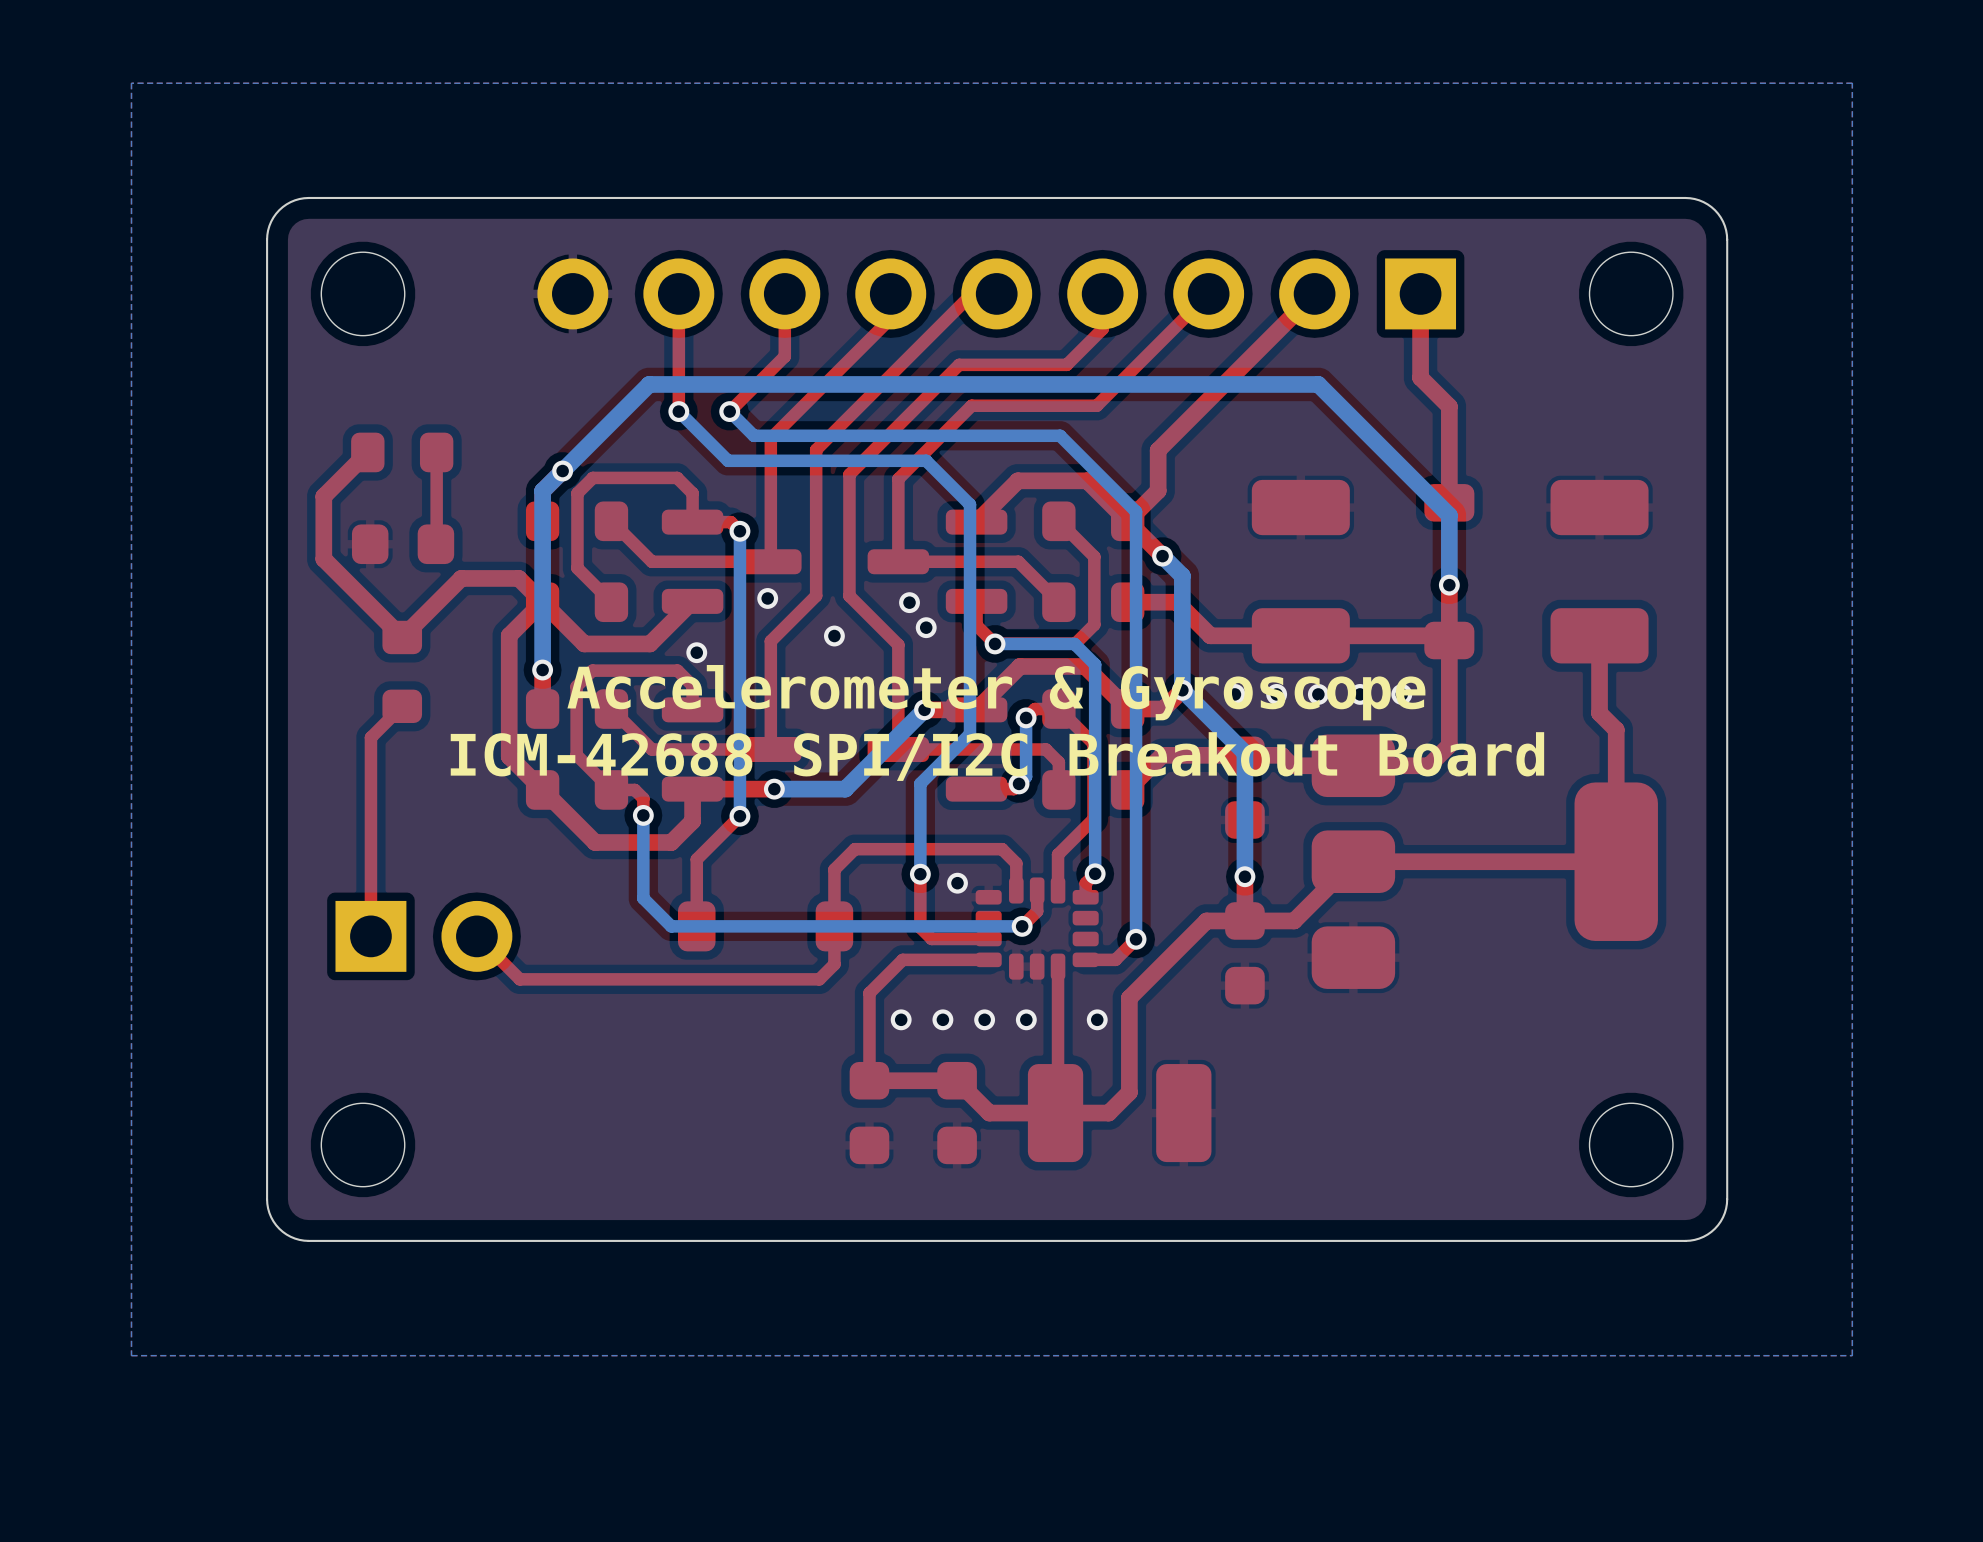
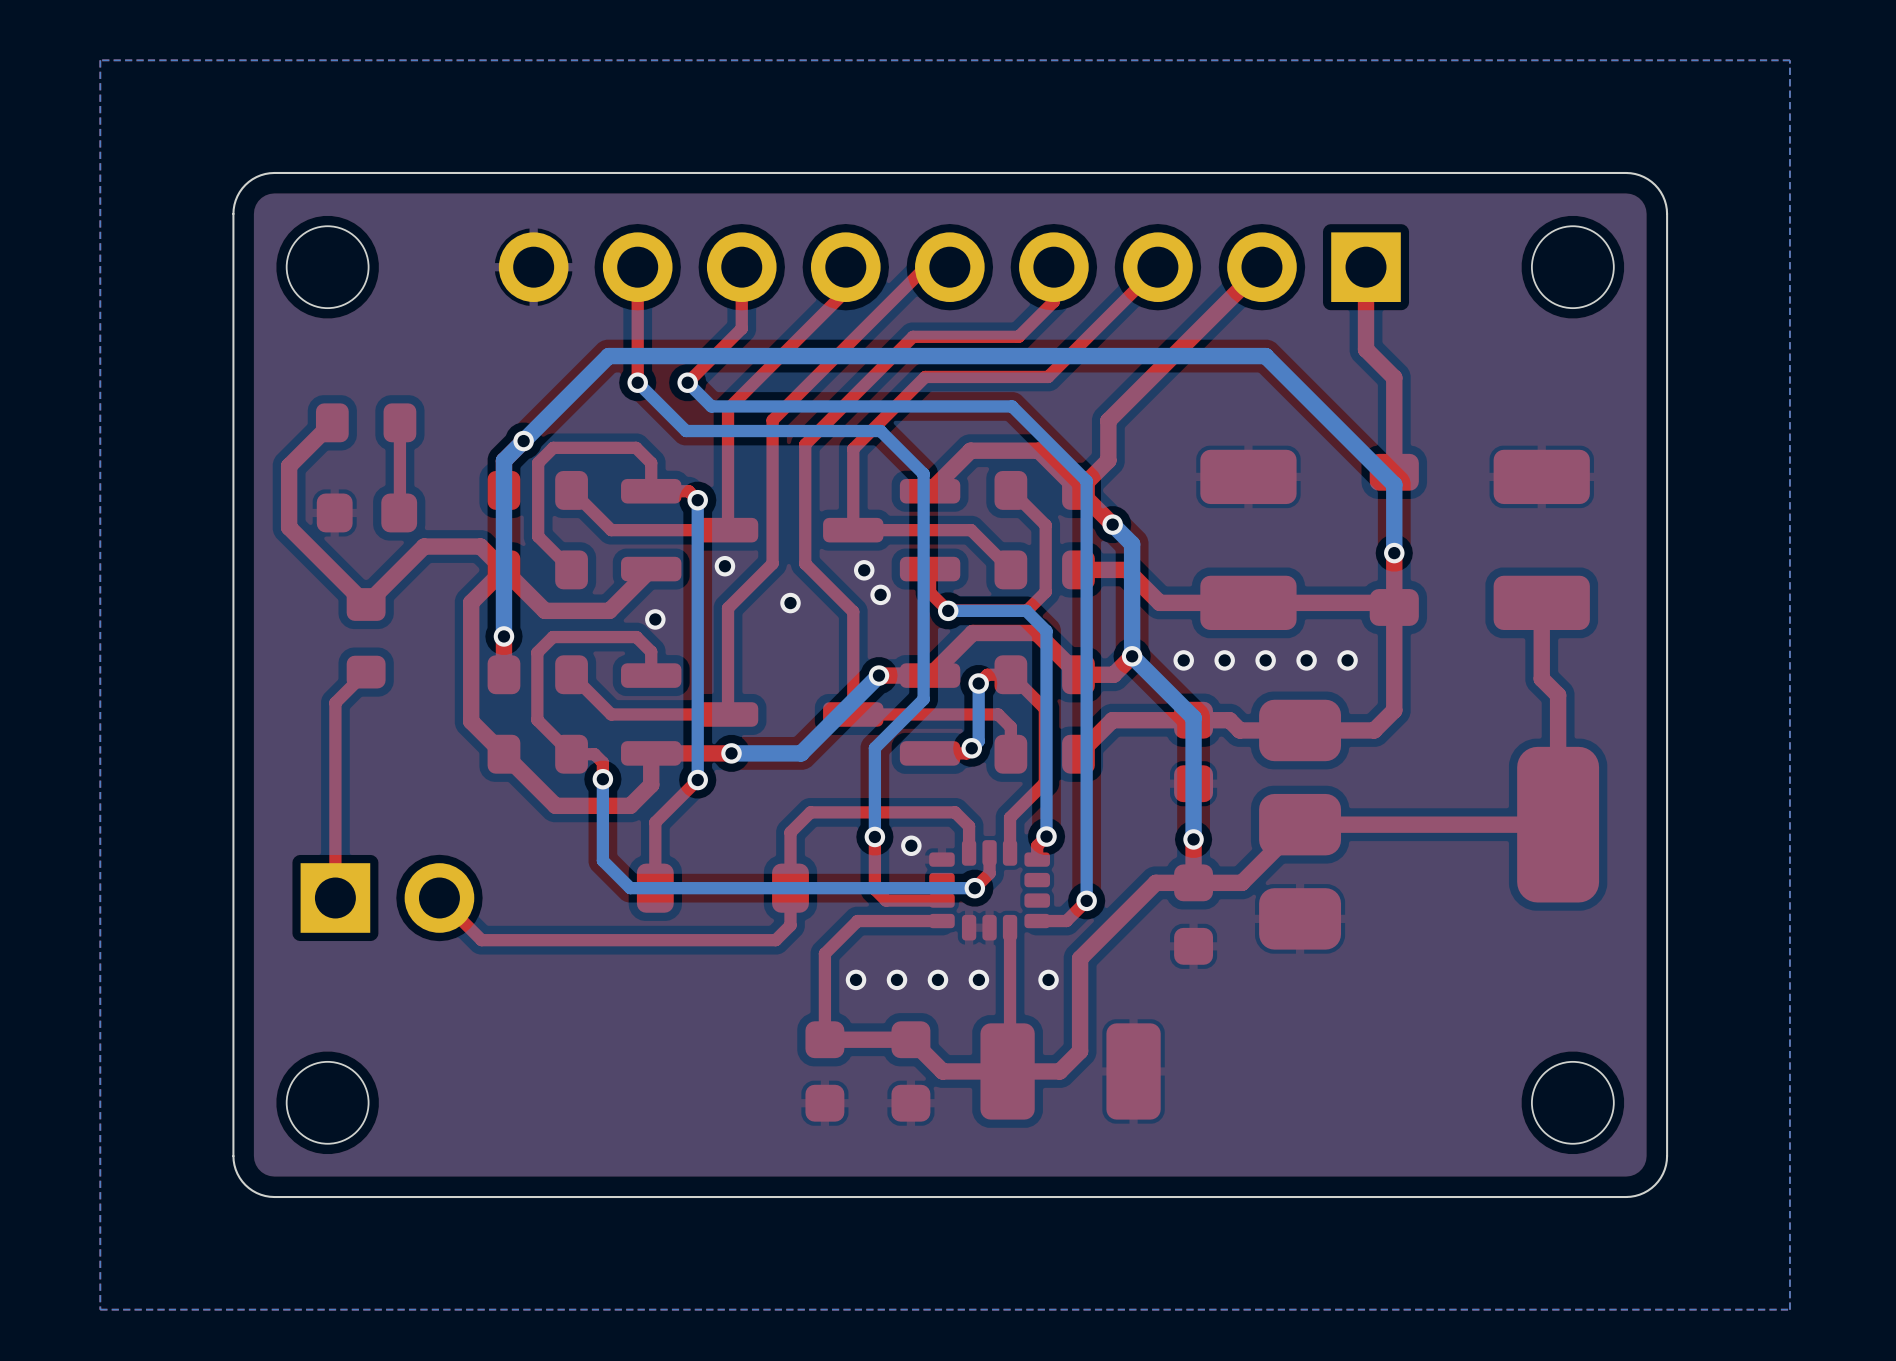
text: Accelerometer & Gyroscope (996, 692) -> none
text: ICM-42688 SPI/I2C Breakout Board (997, 756) -> none

